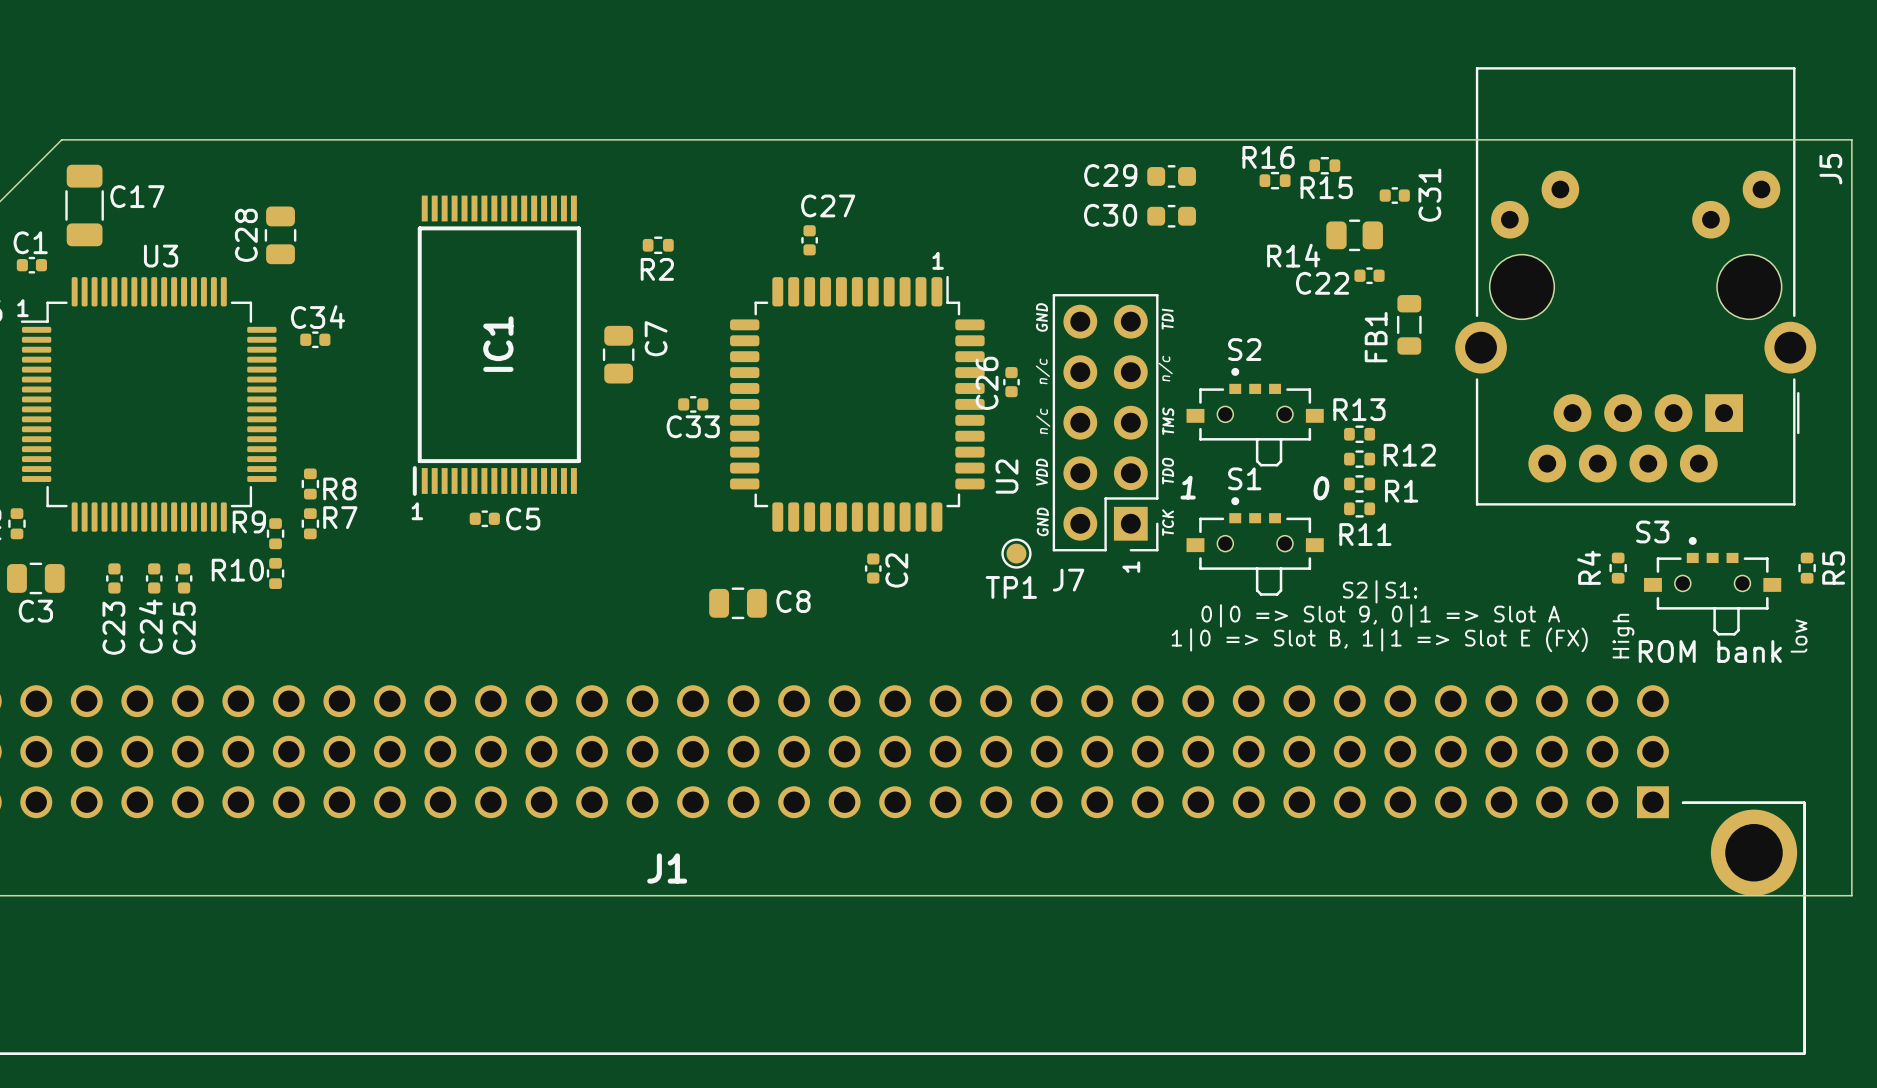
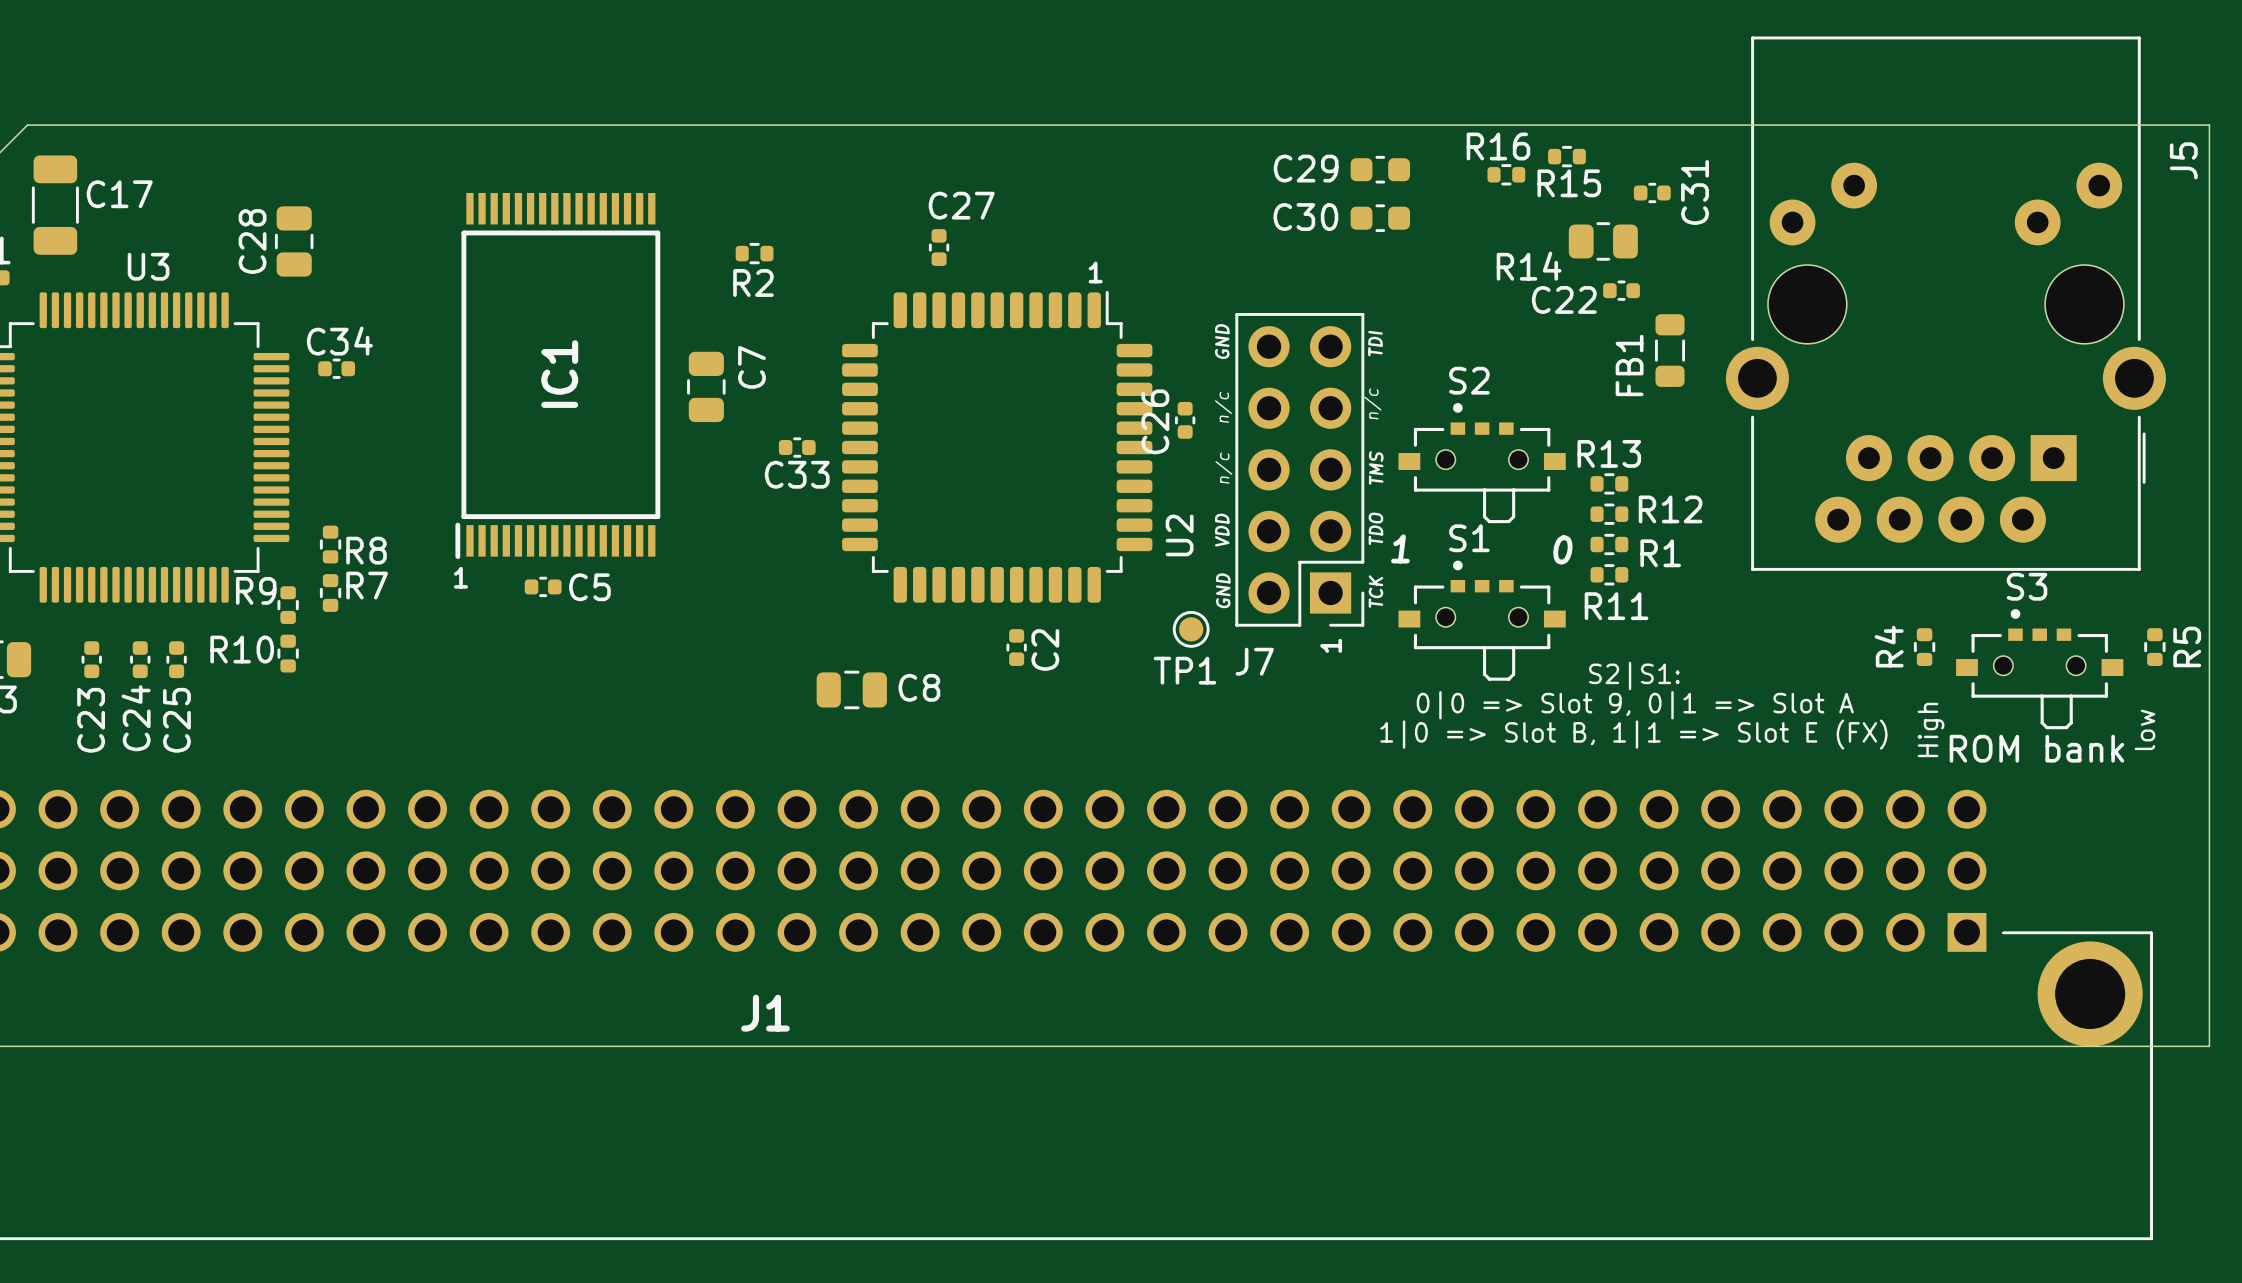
S3 name position: S3 (1652, 531) -> S3 (2027, 586)

